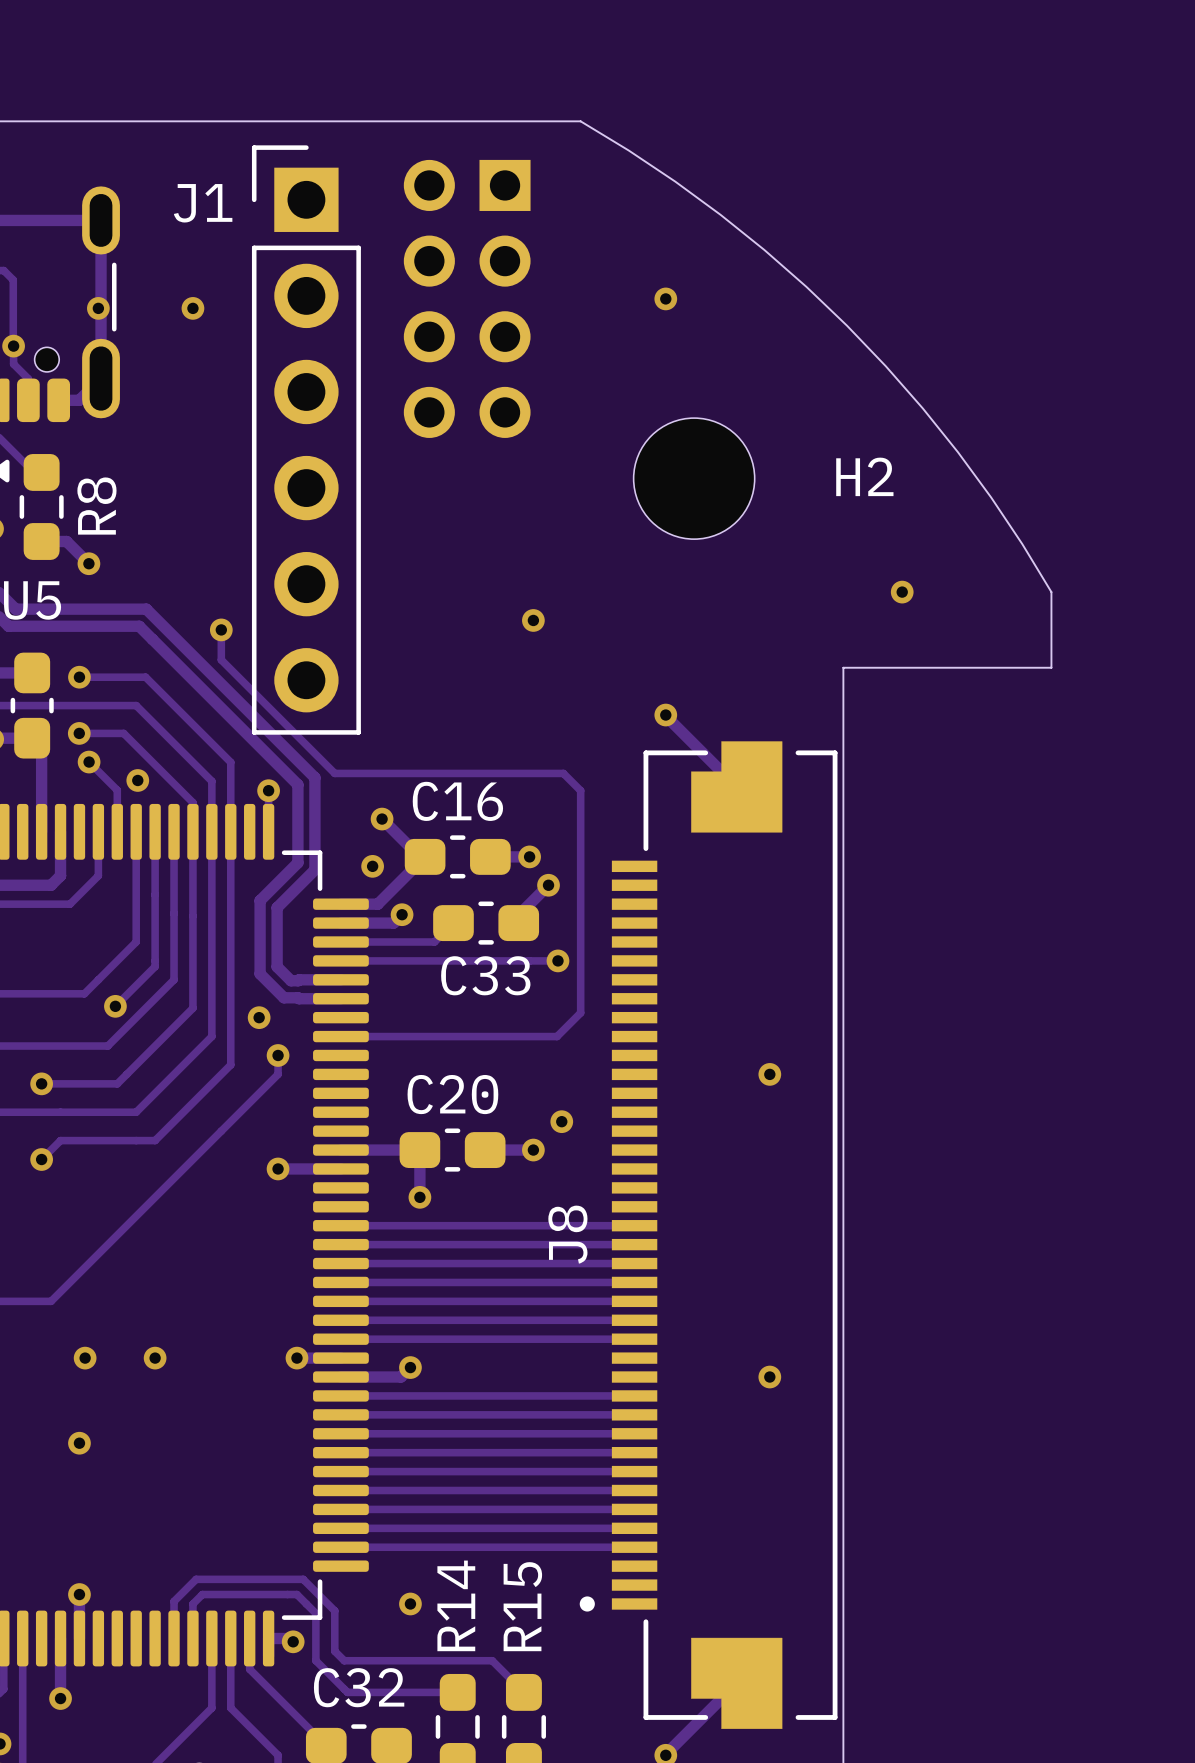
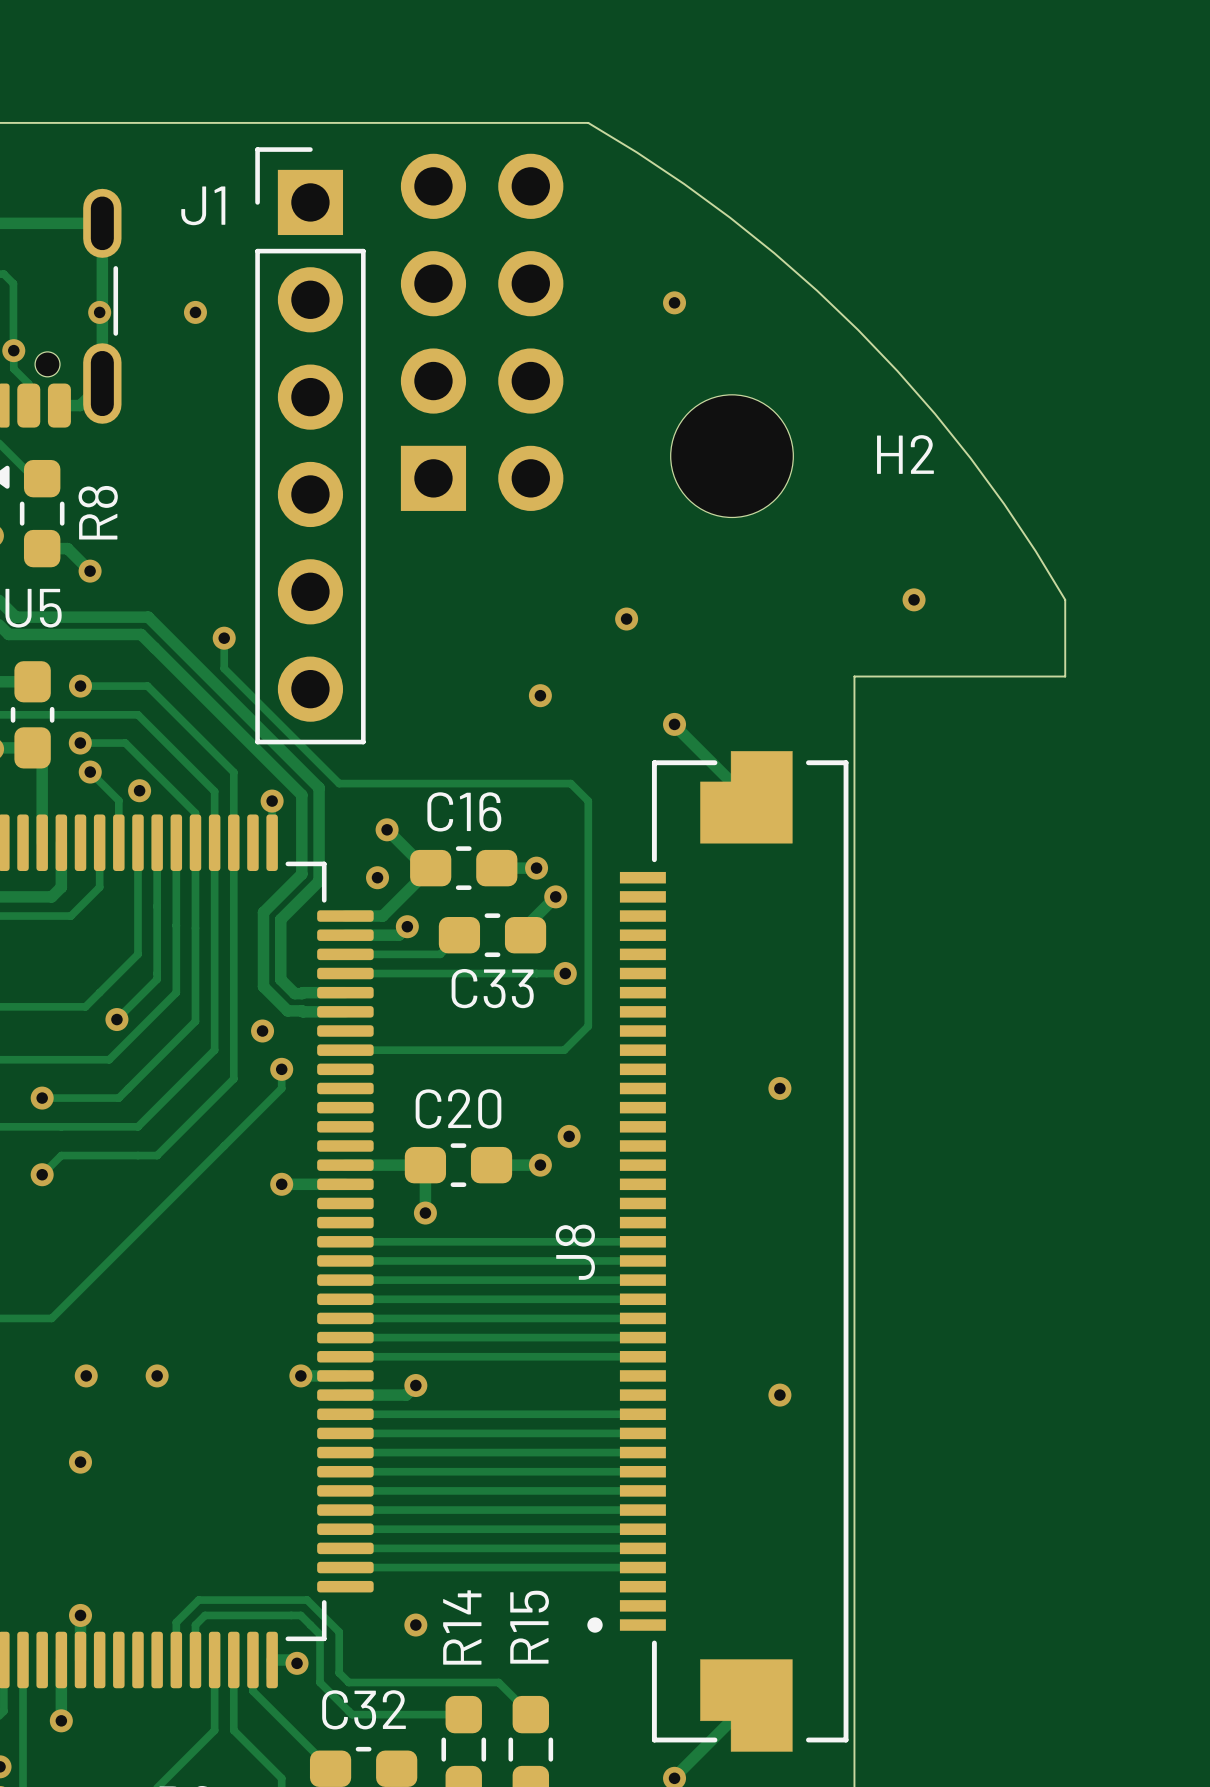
part footprint: [403, 159, 531, 438] -> [400, 153, 564, 511]
H2 position: (694, 478) -> (732, 456)
via: none -> (626, 619)
via: (533, 620) -> none
via: none -> (540, 695)

